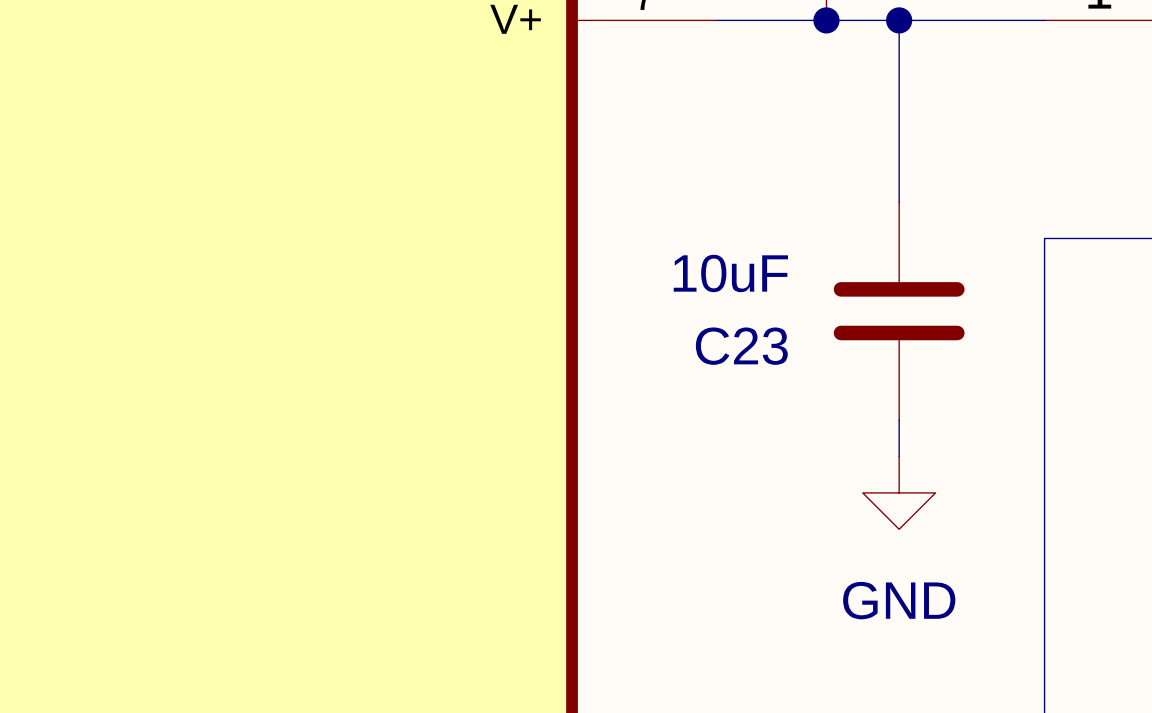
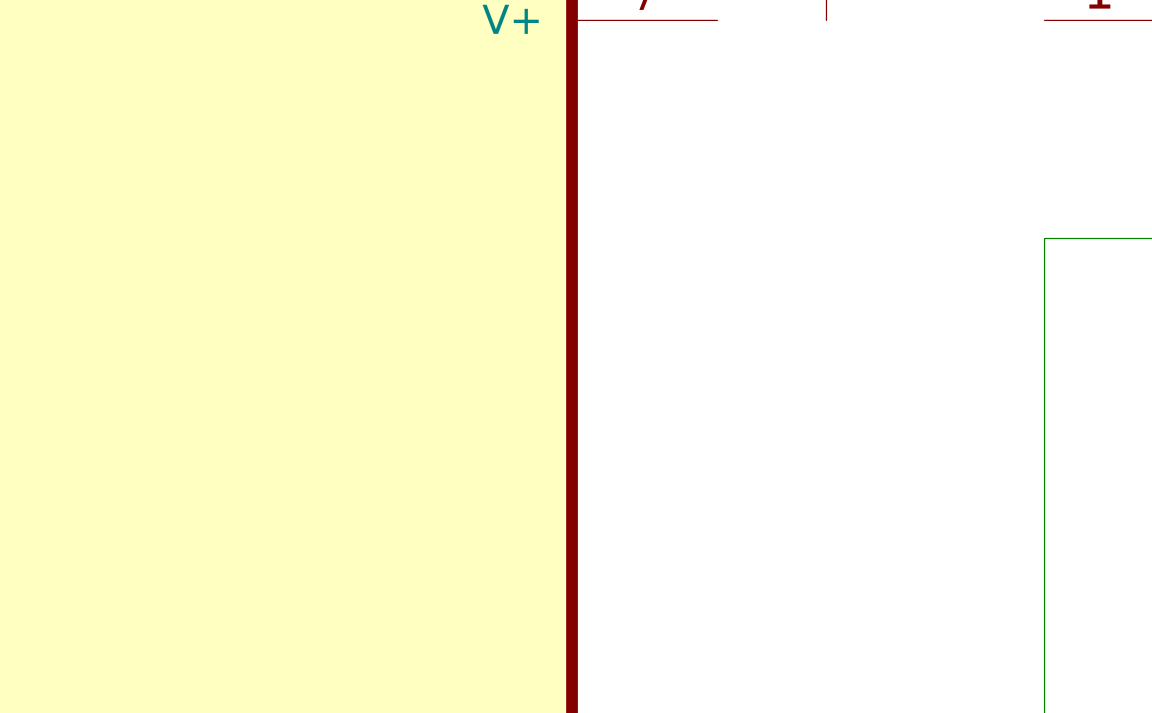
wire: (717, 20) (1044, 20) -> none
junction: (826, 20) -> none
wire: (899, 20) (899, 202) -> none
junction: (899, 20) -> none
C23: 10uF (899, 311) -> none
wire: (899, 420) (899, 456) -> none
power symbol: GND (899, 492) -> none

